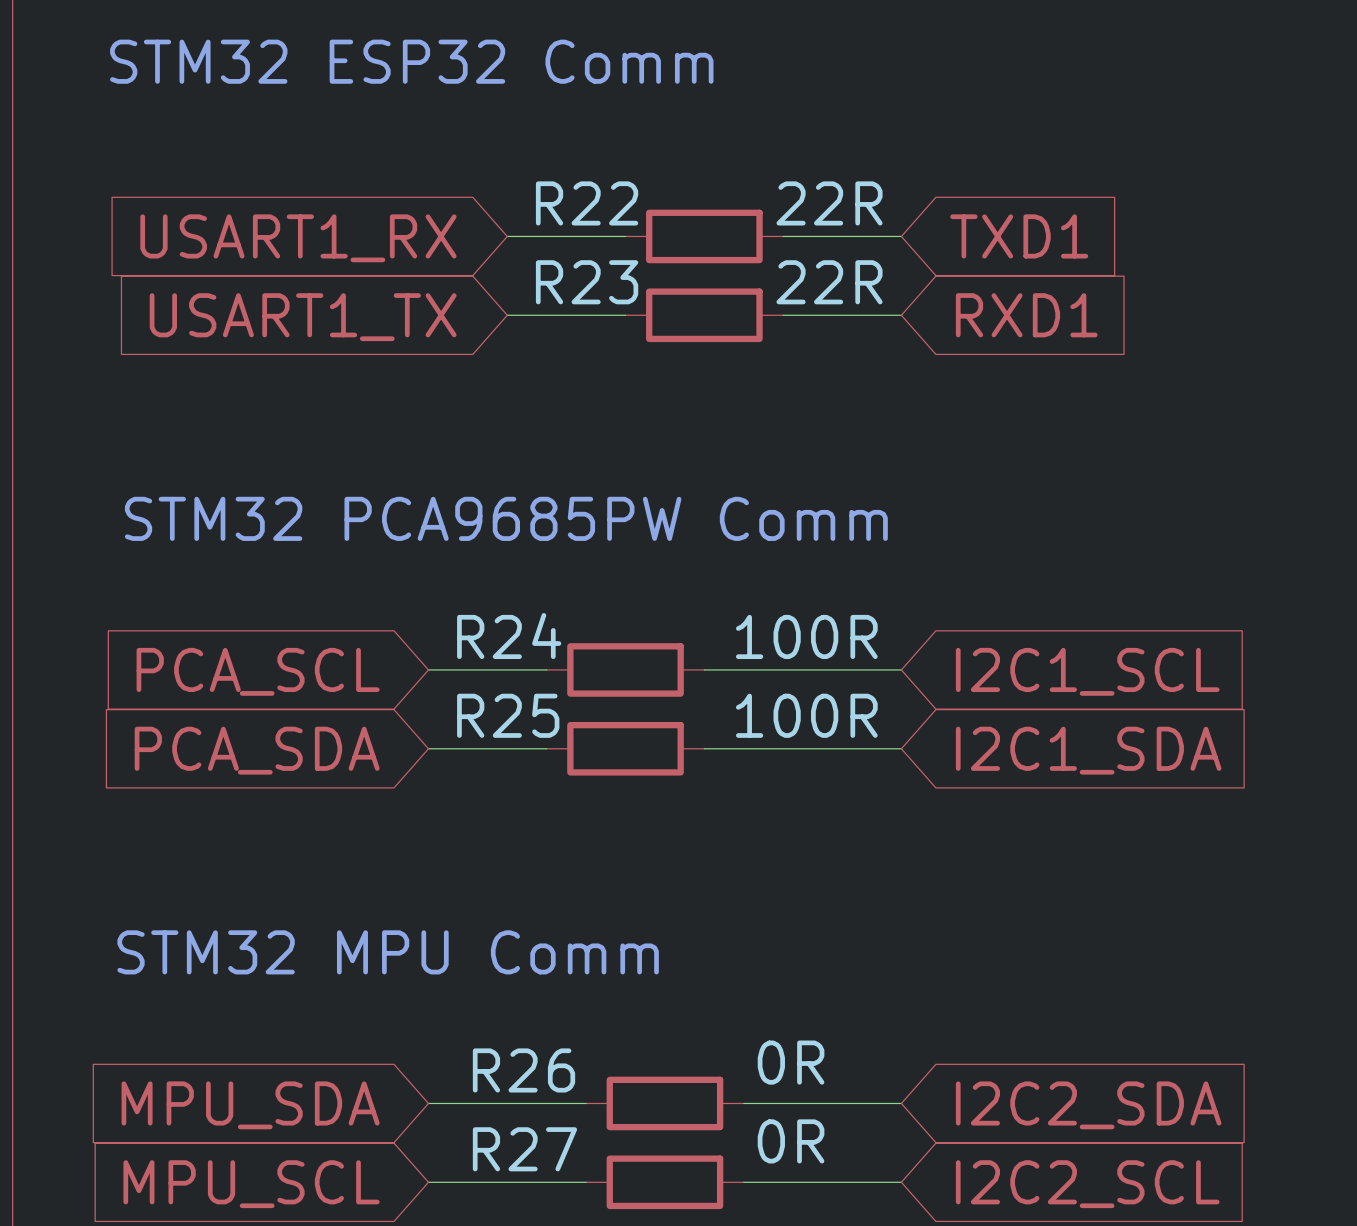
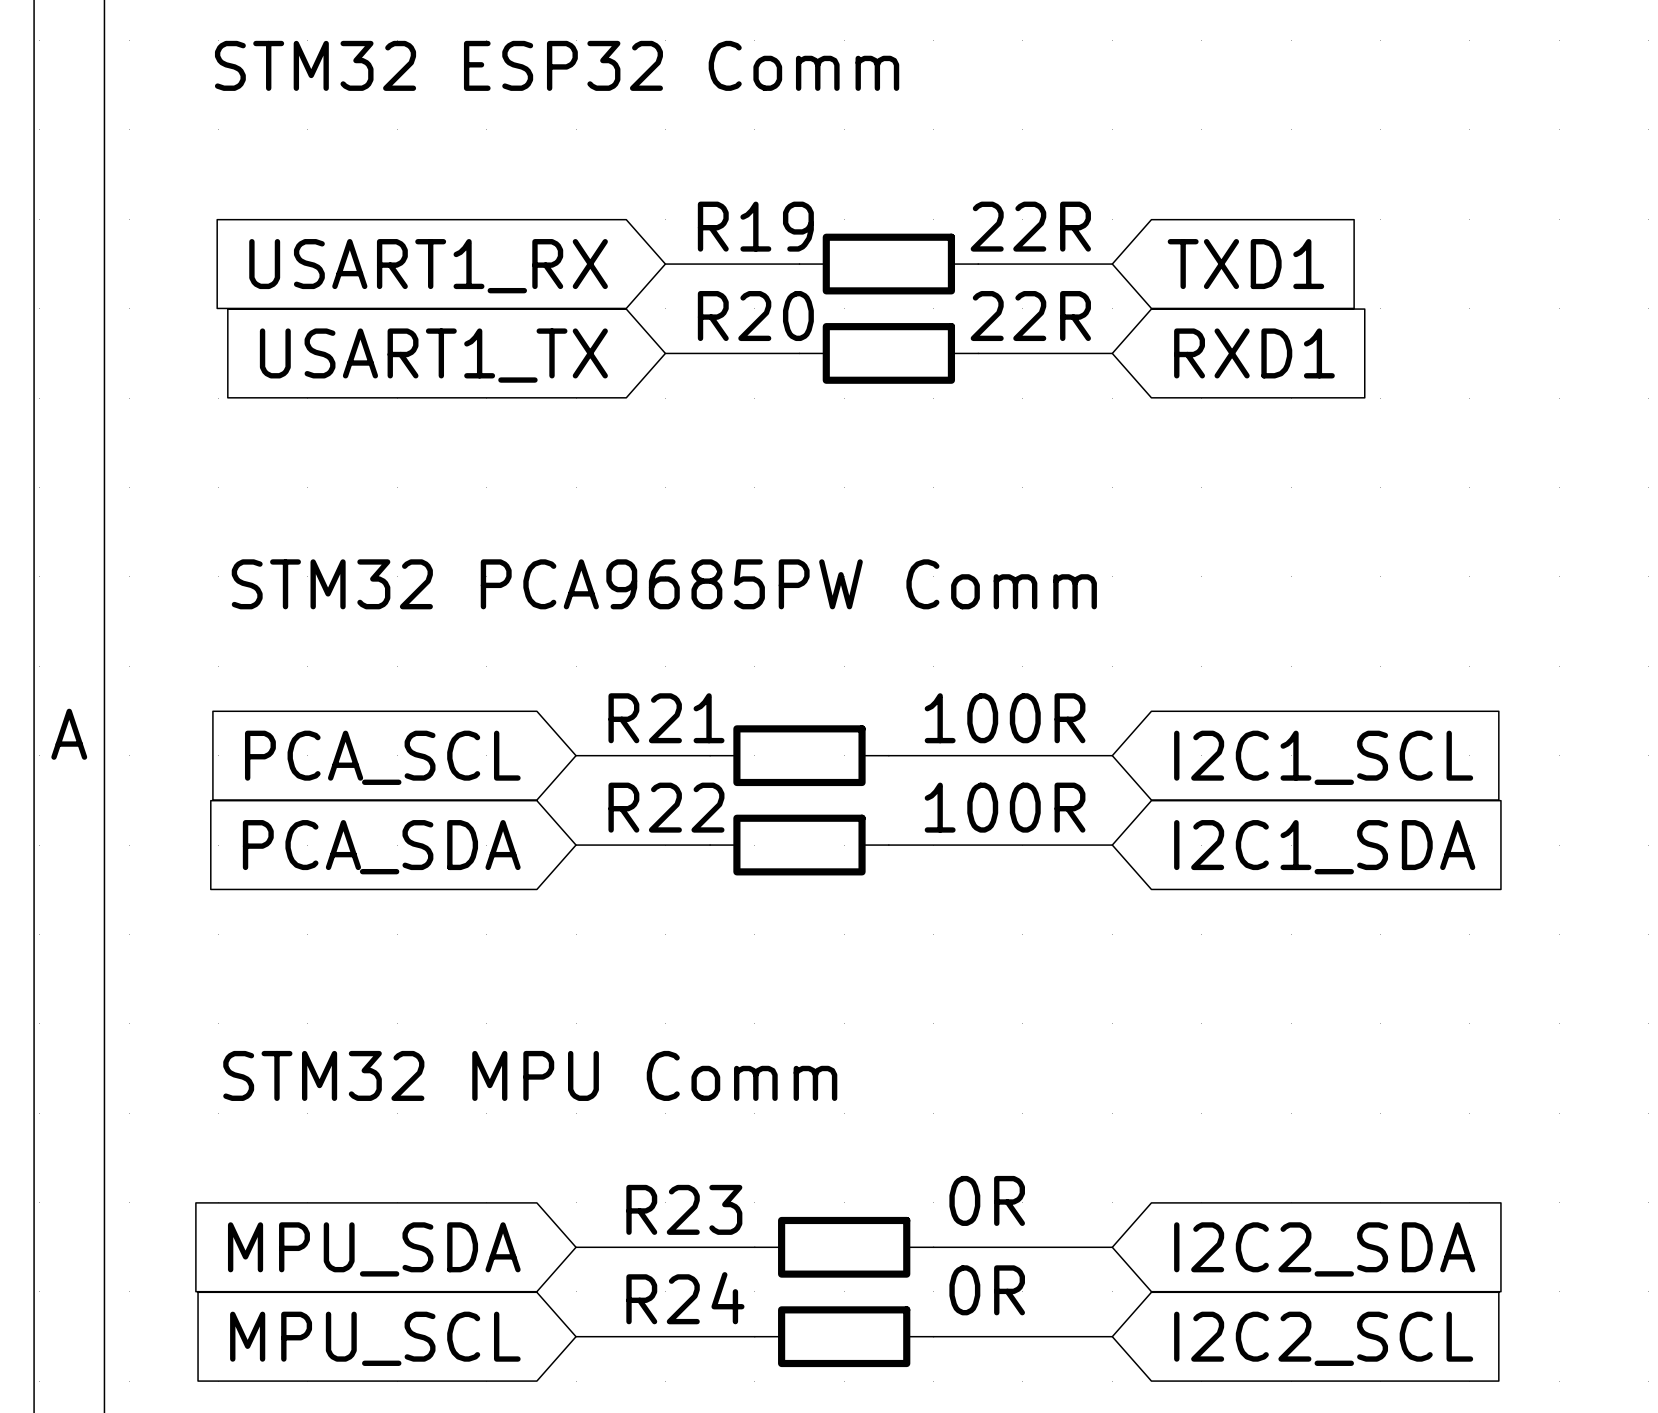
R22 name: R22 (587, 203) -> R19 (755, 226)
R23 name: R23 (587, 282) -> R20 (755, 316)
R24 name: R24 (509, 636) -> R21 (666, 718)
R25 name: R25 (508, 715) -> R22 (666, 807)
R26 name: R26 (524, 1070) -> R23 (684, 1209)
R27 name: R27 (524, 1149) -> R24 (685, 1298)

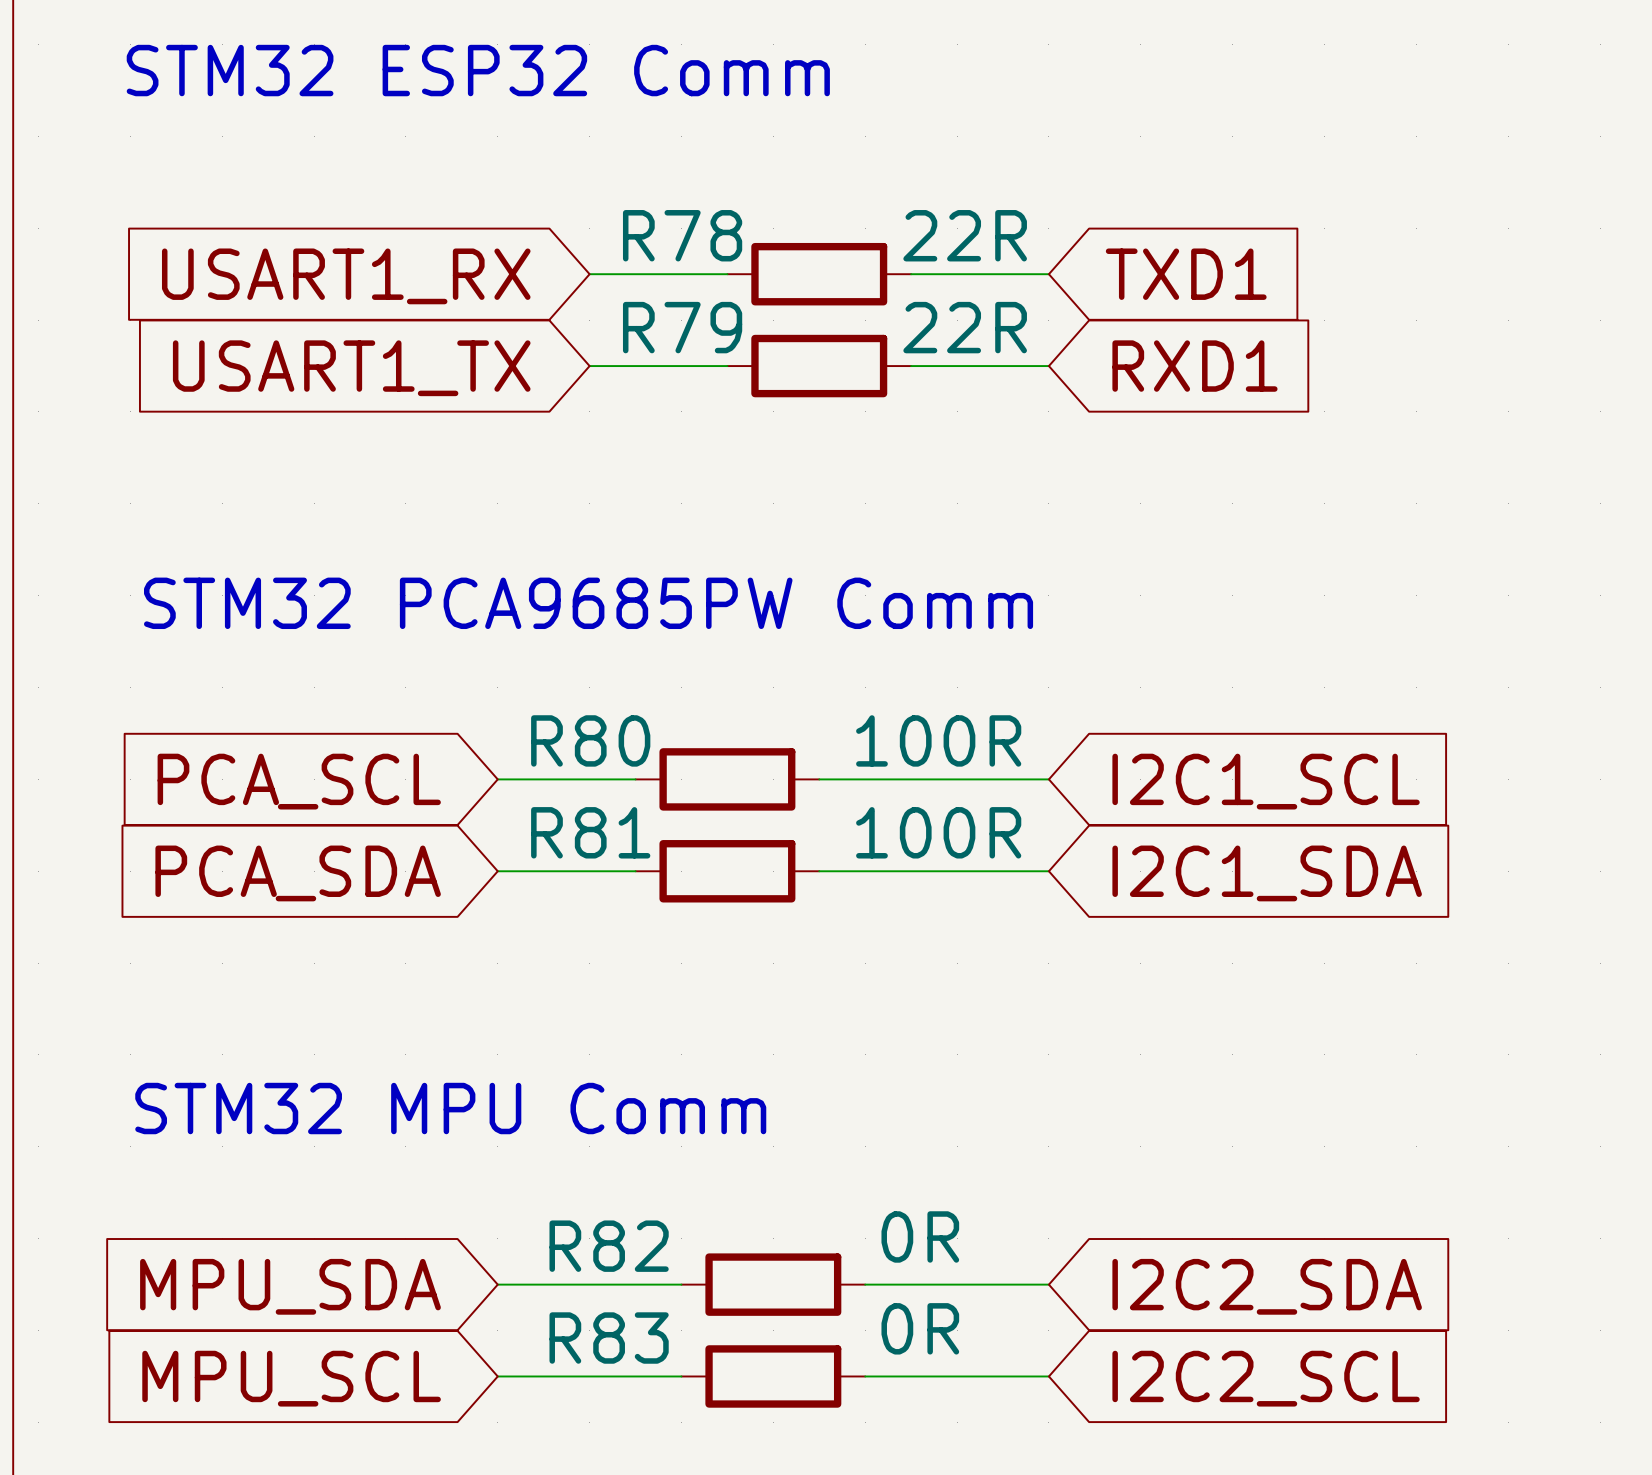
R19 name: R19 (755, 226) -> R78 (682, 235)
R20 name: R20 (755, 316) -> R79 (682, 327)
R21 name: R21 (666, 718) -> R80 (590, 740)
R22 name: R22 (666, 807) -> R81 (590, 832)
R23 name: R23 (684, 1209) -> R82 (609, 1246)
R24 name: R24 (685, 1298) -> R83 (609, 1338)

